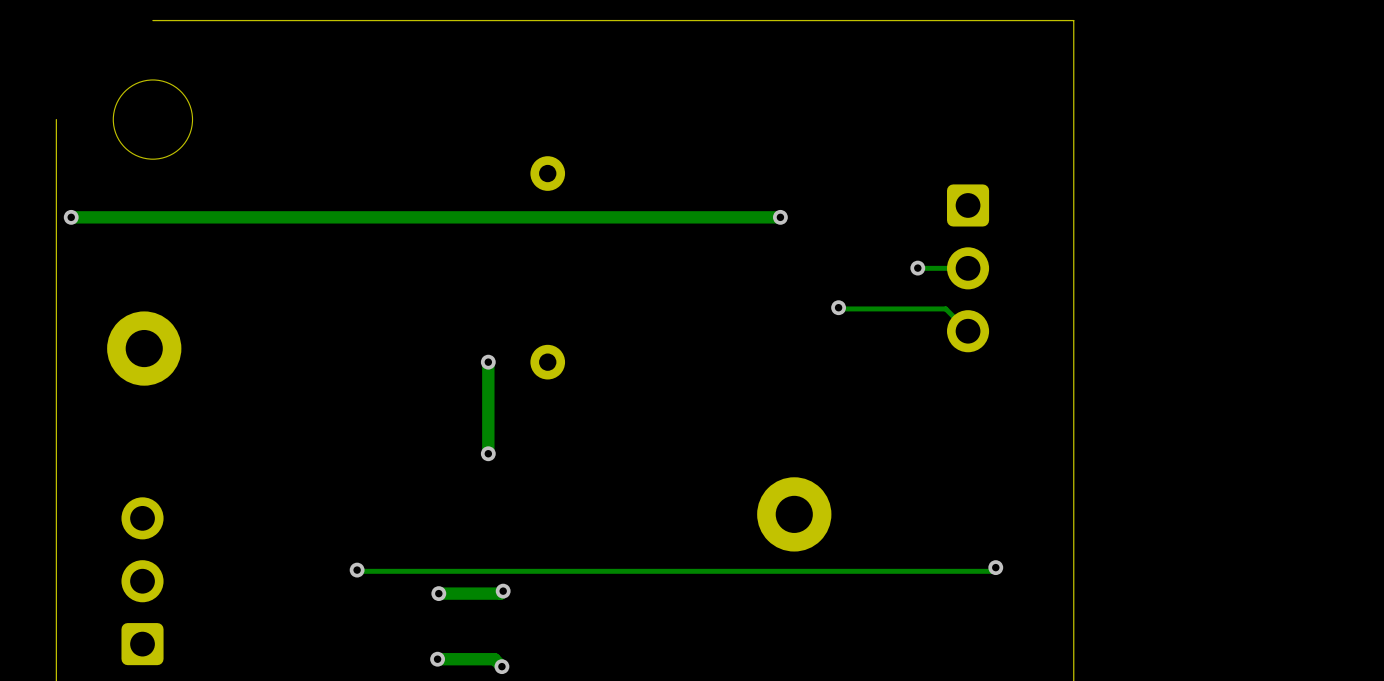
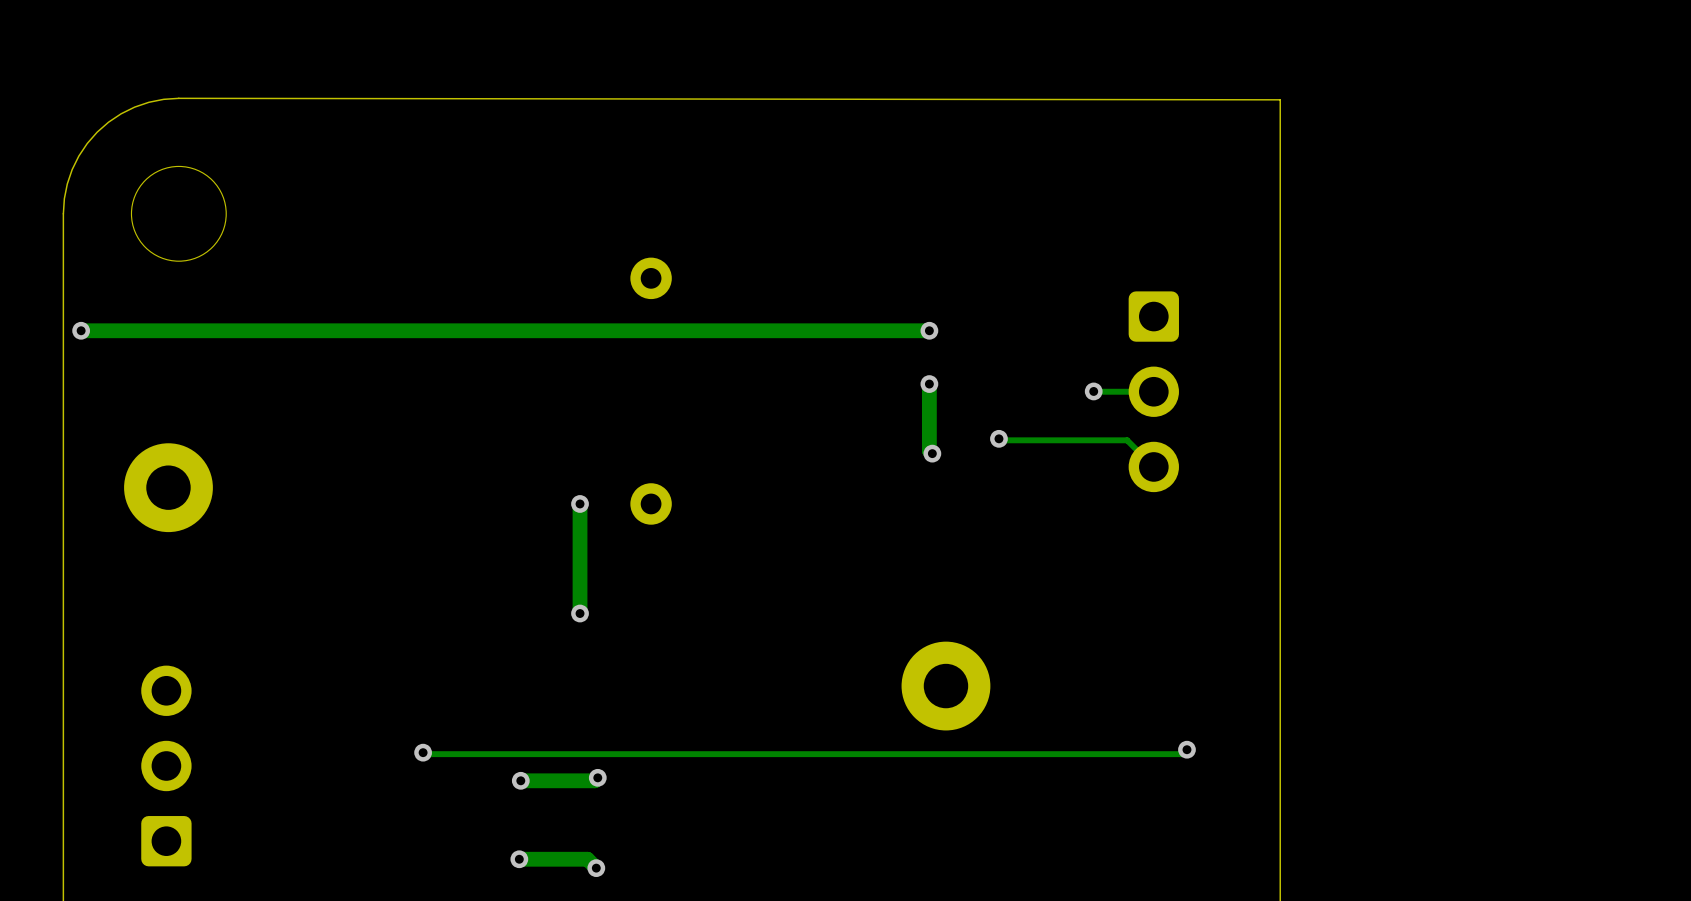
board edge: (152, 20) (1073, 20) (1073, 24) -> (63, 213) (67, 183) (72, 169) (87, 143) (97, 132) (121, 113) (148, 102) (163, 99) (1280, 99)
track: none -> (929, 384) (929, 450) (932, 453)
via: none -> (929, 384)
via: none -> (932, 453)

